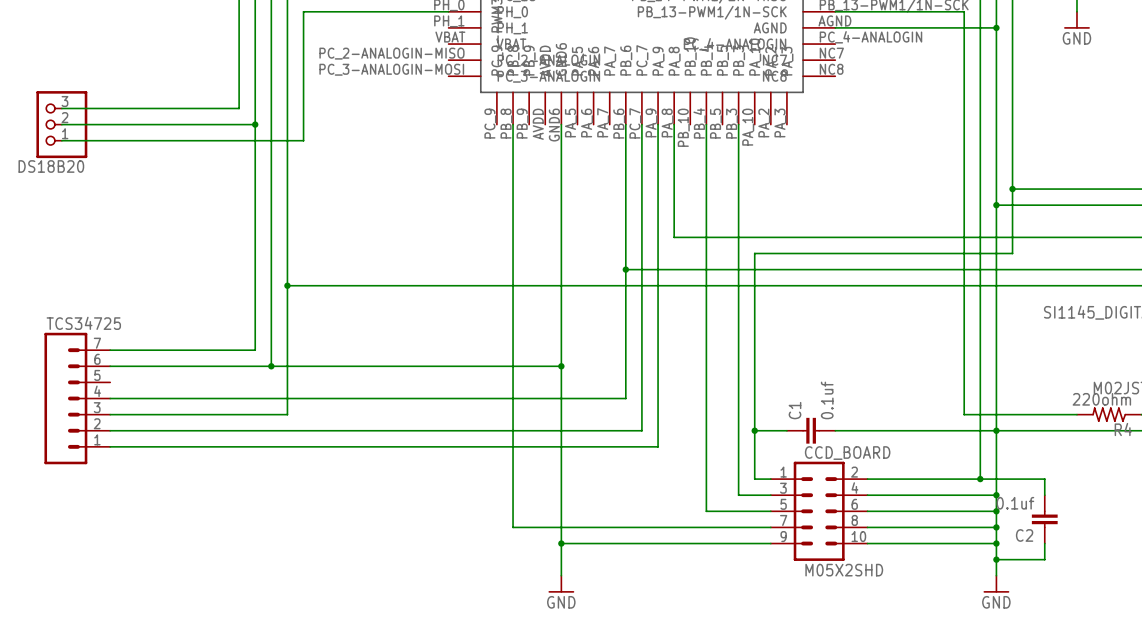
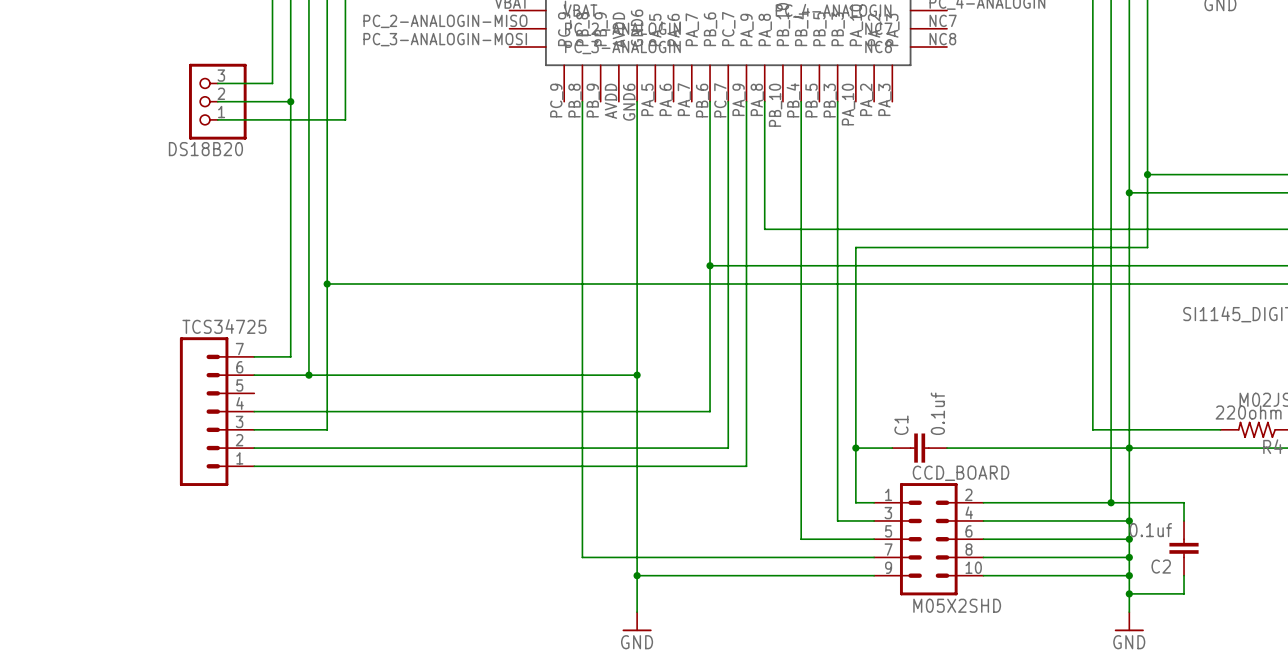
wire: (61, 108) (190, 108) -> none
wire: (61, 124) (190, 124) -> none
DS18B20 position: (61, 124) -> (217, 101)
wire: (61, 140) (190, 140) -> none
wire: (110, 350) (222, 350) -> none
wire: (110, 366) (222, 366) -> none
TCS34725 position: (77, 398) -> (217, 411)
wire: (110, 398) (222, 398) -> none
wire: (110, 414) (222, 414) -> none
wire: (110, 430) (222, 430) -> none
wire: (110, 446) (222, 446) -> none

